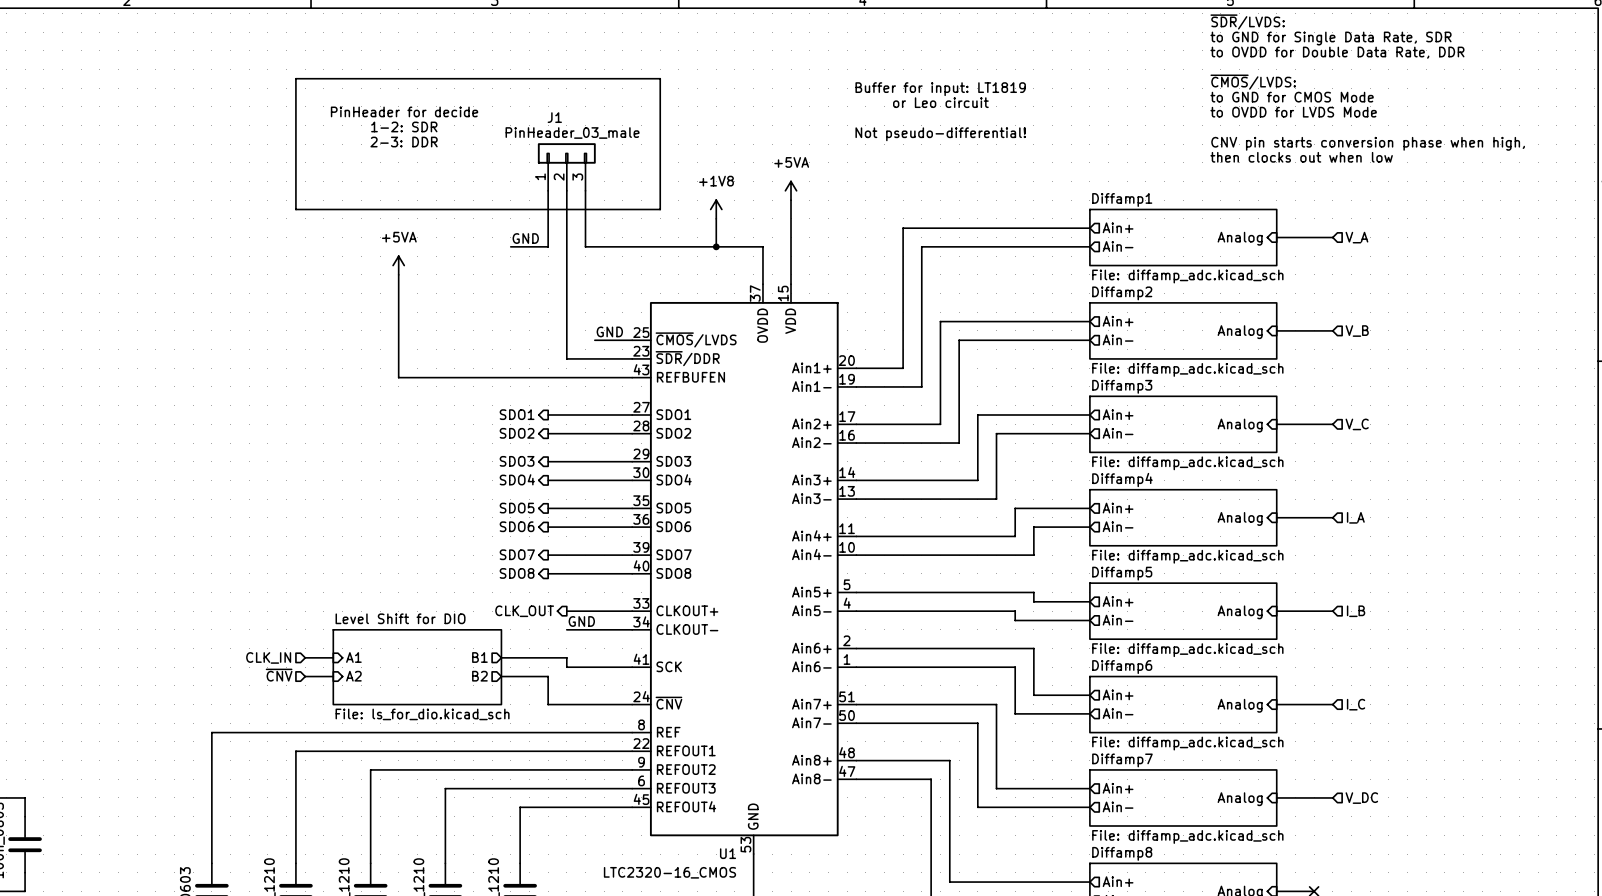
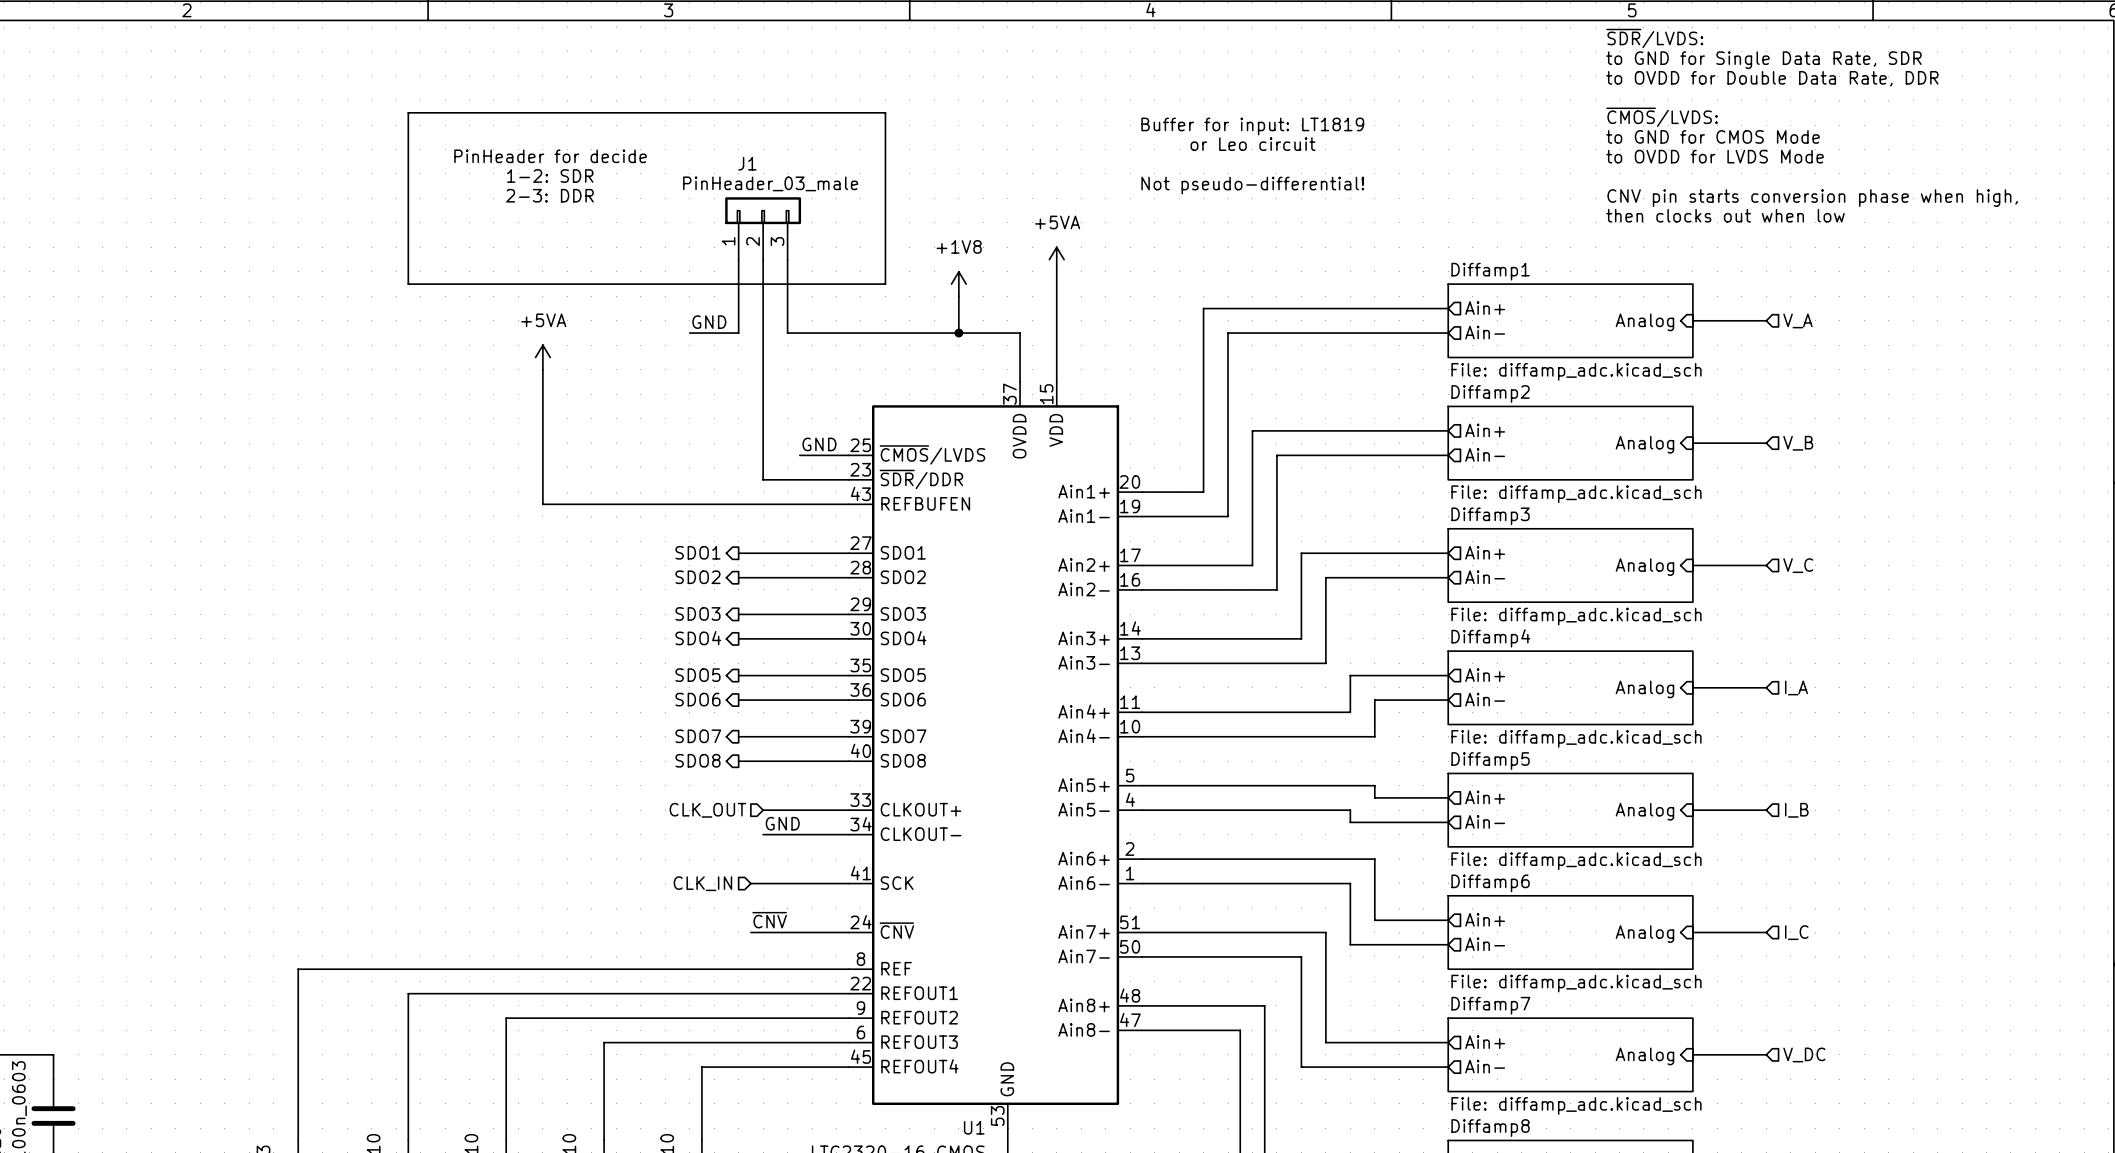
hierarchical label shape: output (524, 611) -> input (707, 810)
hierarchical label: CLK_IN (268, 657) -> none
wire: (305, 657) (333, 657) -> none
sheet pin: A1 (353, 657) -> none
sheet pin: B1 (479, 657) -> none
wire: (501, 657) (566, 657) (566, 667) -> (750, 883) (763, 883)
sheet Level Shift for DIO: File: ls_for_dio.kicad_sch (417, 667) -> none
hierarchical label: none -> CLK_IN (702, 883)
hierarchical label: ~{CNV} (279, 675) -> none
wire: (305, 676) (333, 676) -> none
sheet pin: A2 (353, 676) -> none
sheet pin: B2 (479, 676) -> none
wire: (501, 676) (548, 676) (548, 704) (557, 704) -> none
label: none -> ~{CNV} (769, 920)

